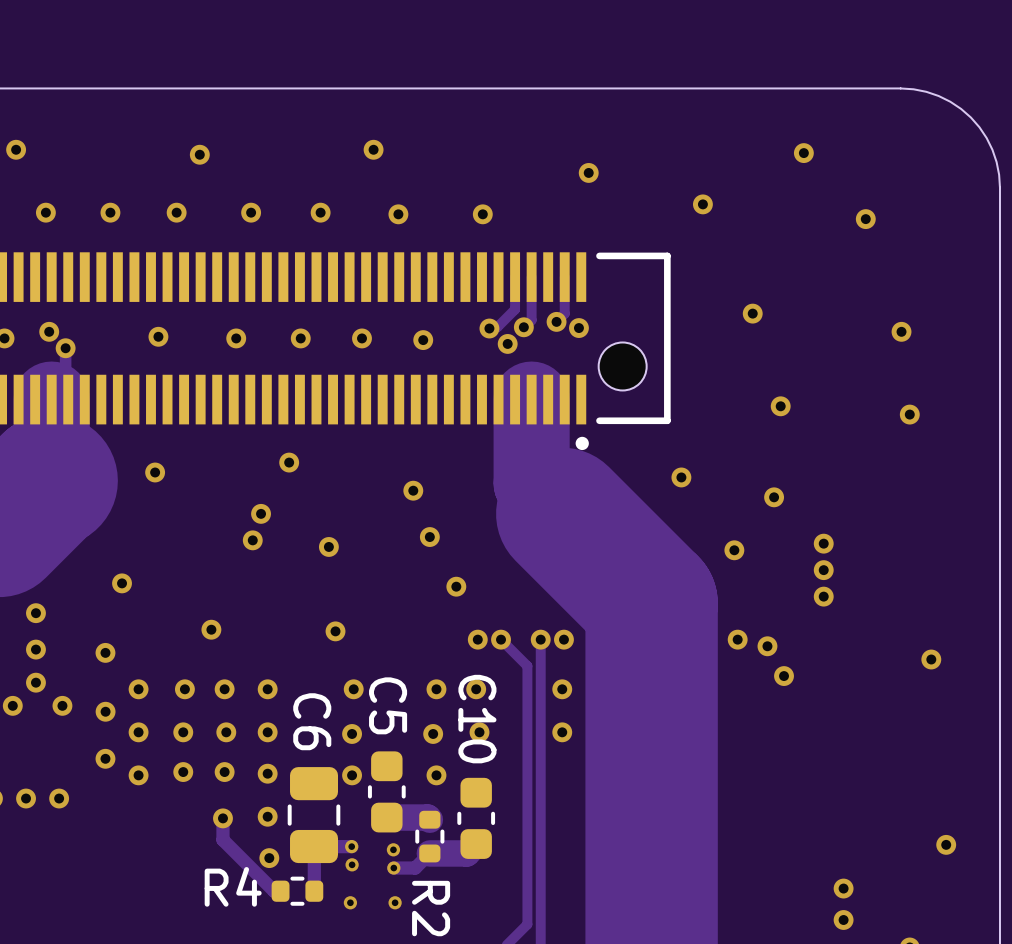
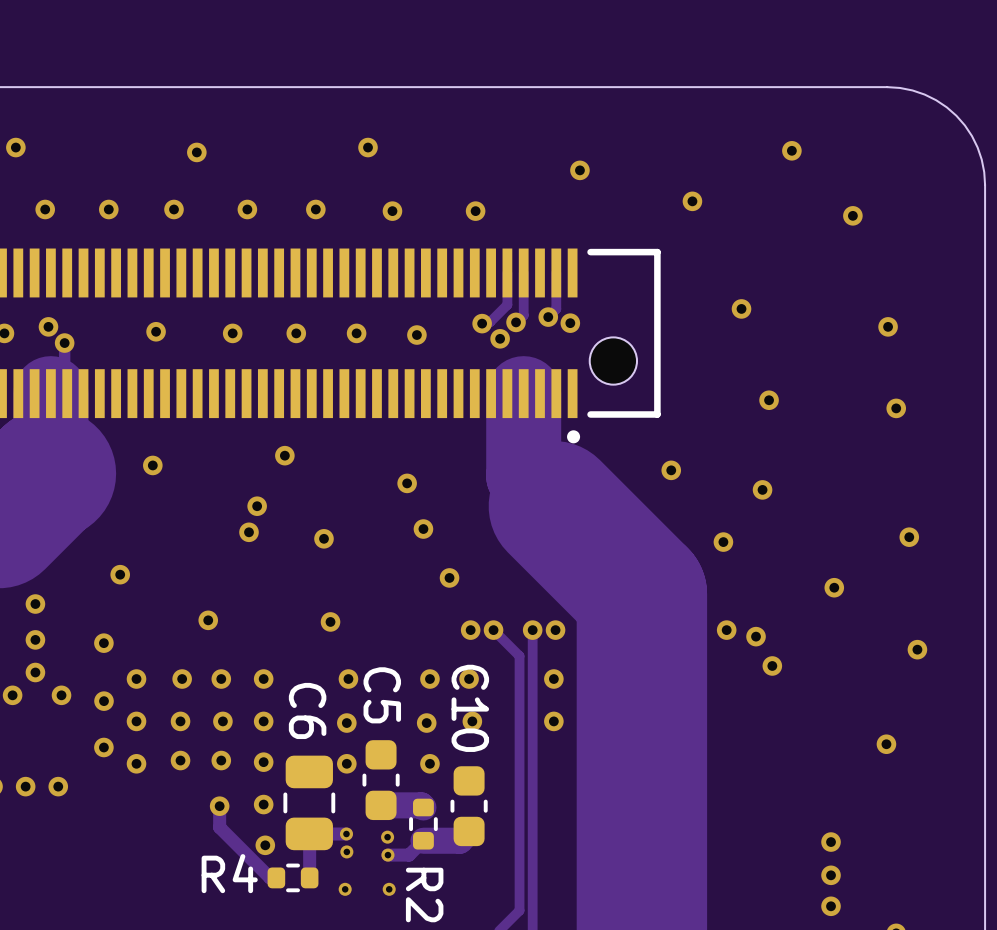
via: (823, 543) -> none
via: none -> (909, 537)
via: (823, 570) -> none
via: (823, 596) -> none
via: none -> (834, 587)
via: none -> (886, 744)
via: (946, 844) -> none
via: none -> (831, 842)

